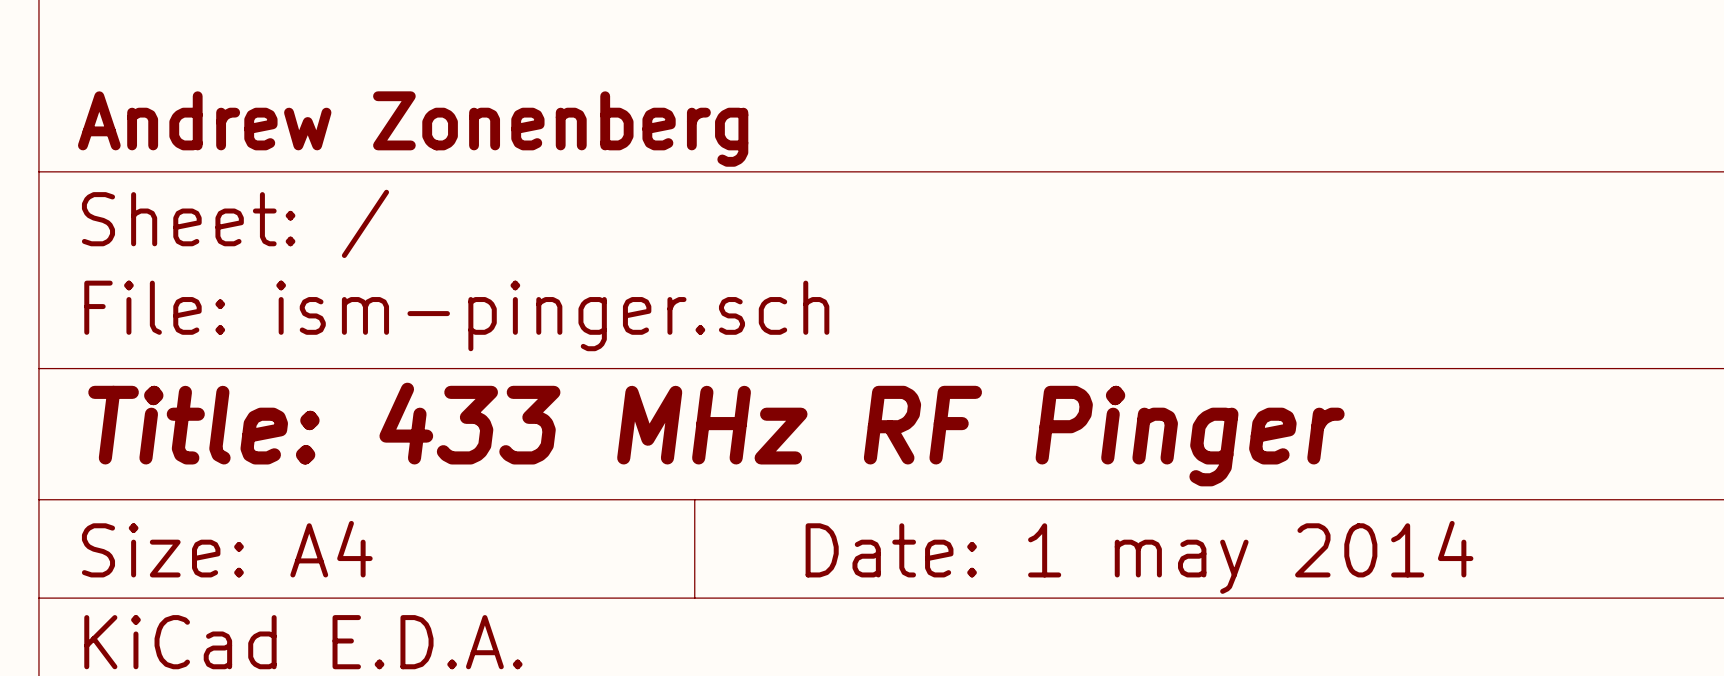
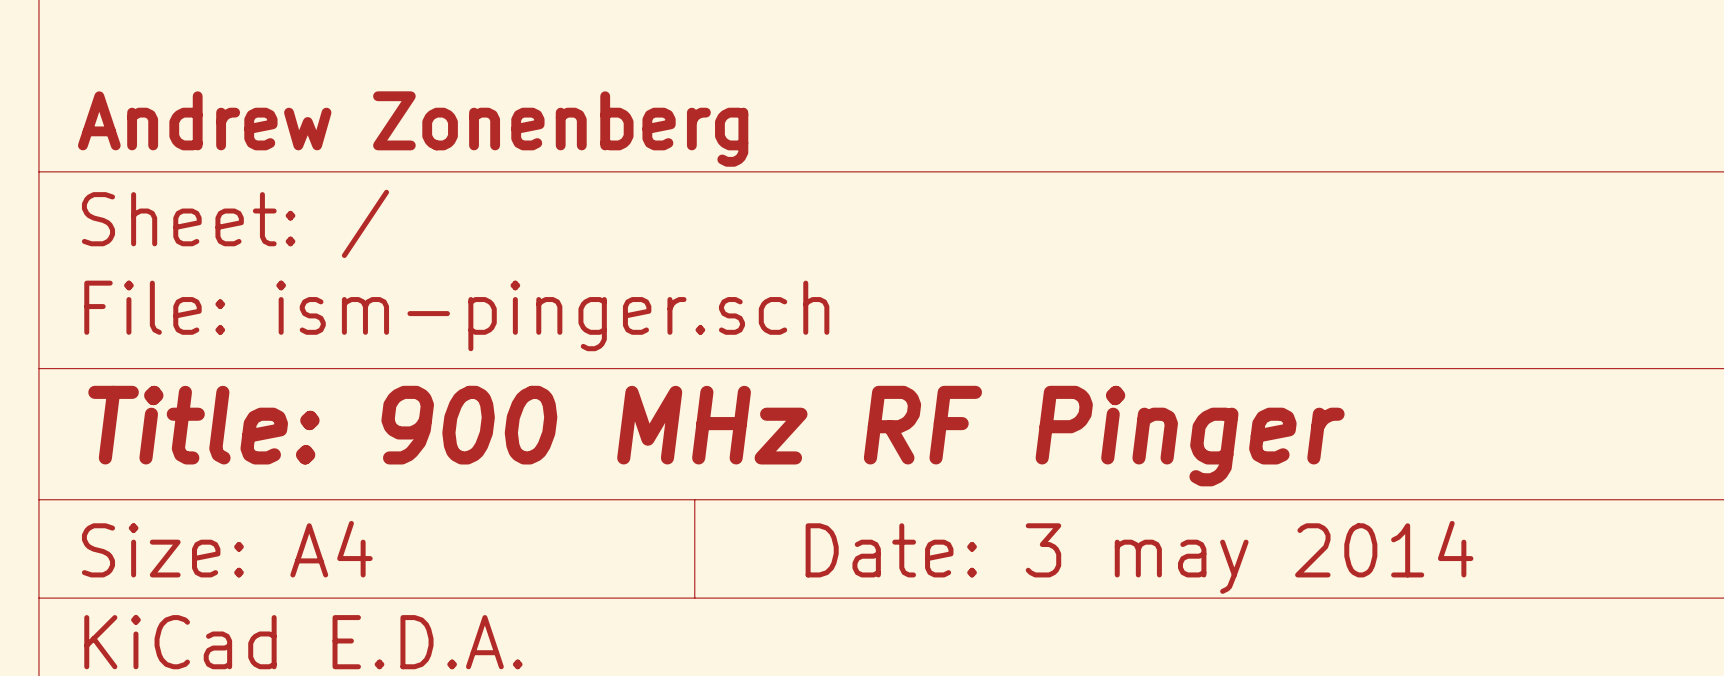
title block: Title: 433 MHz RF Pinger (716, 434) -> Title: 900 MHz RF Pinger (716, 436)
title block: Date: 1 may 2014 (1139, 557) -> Date: 3 may 2014 (1139, 557)

